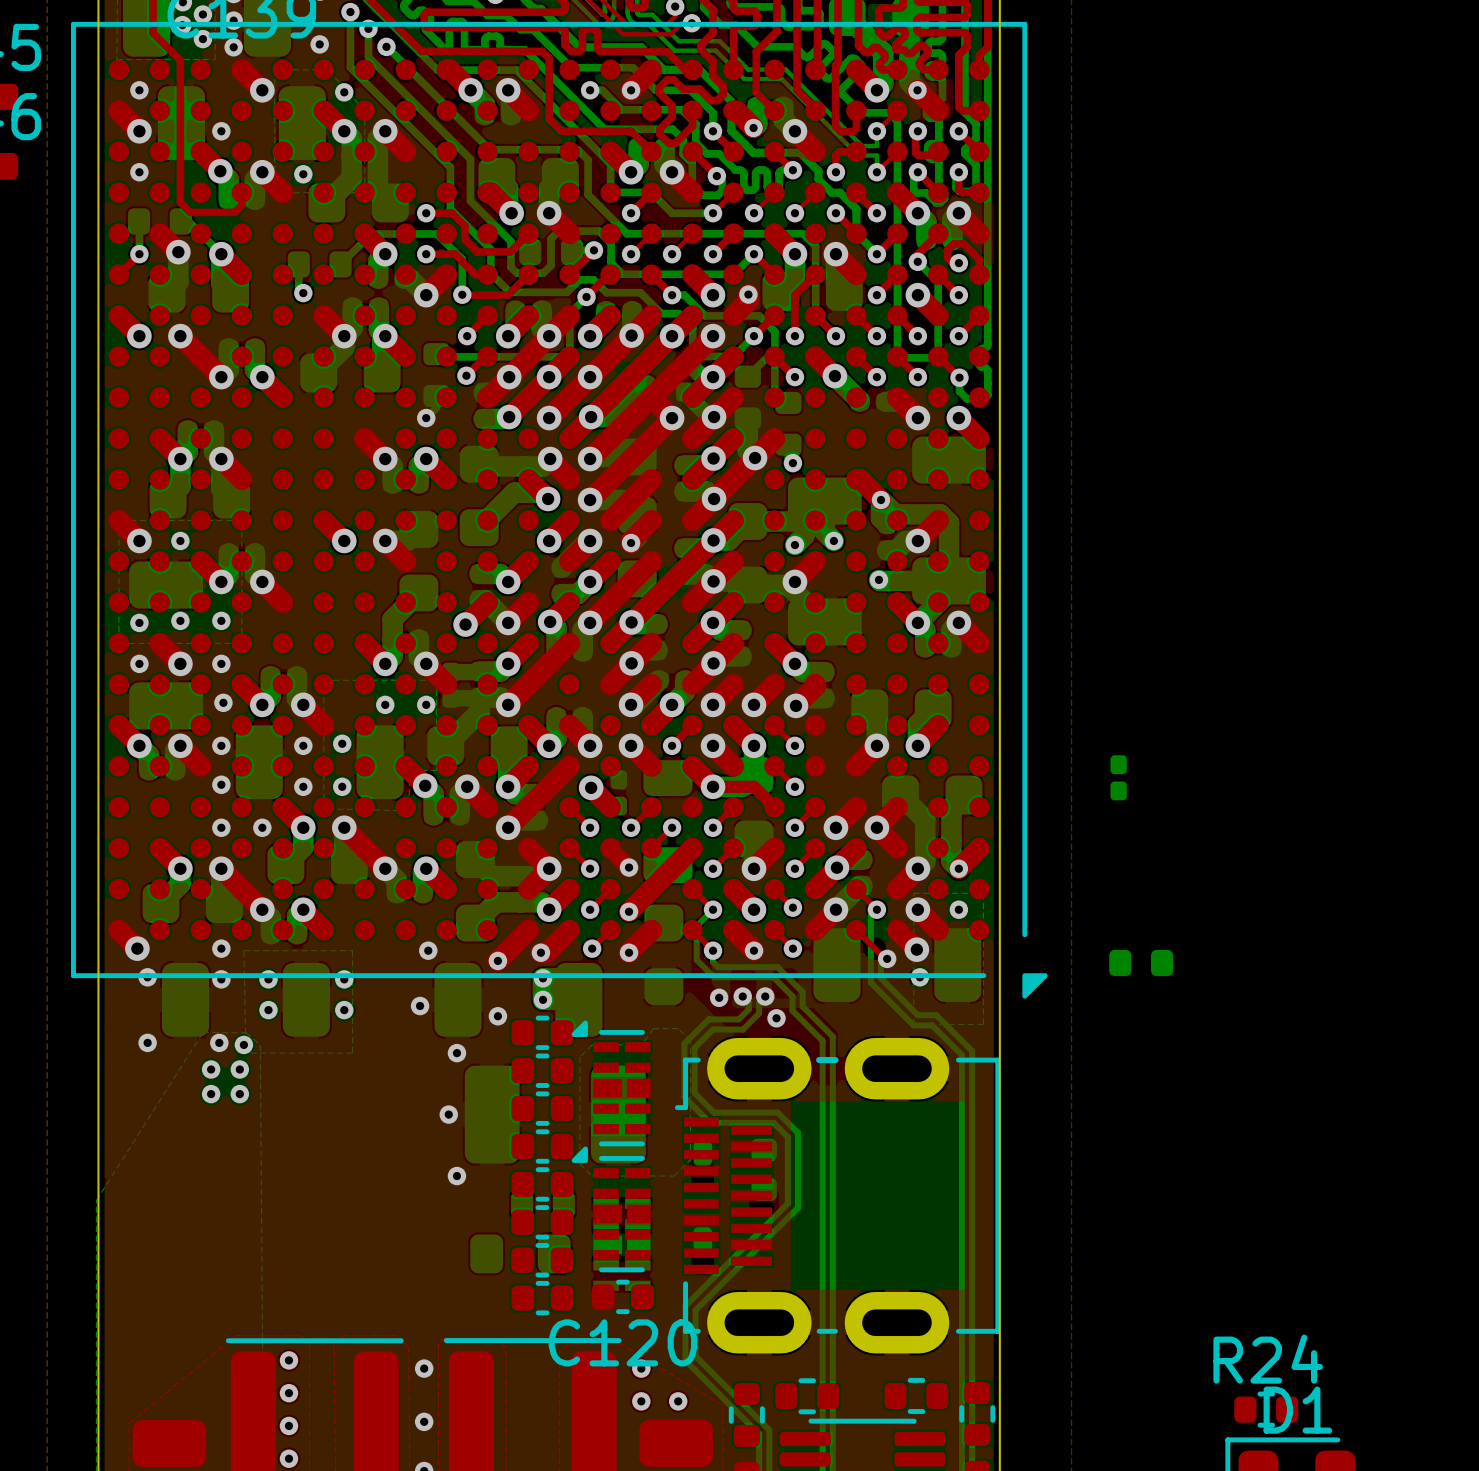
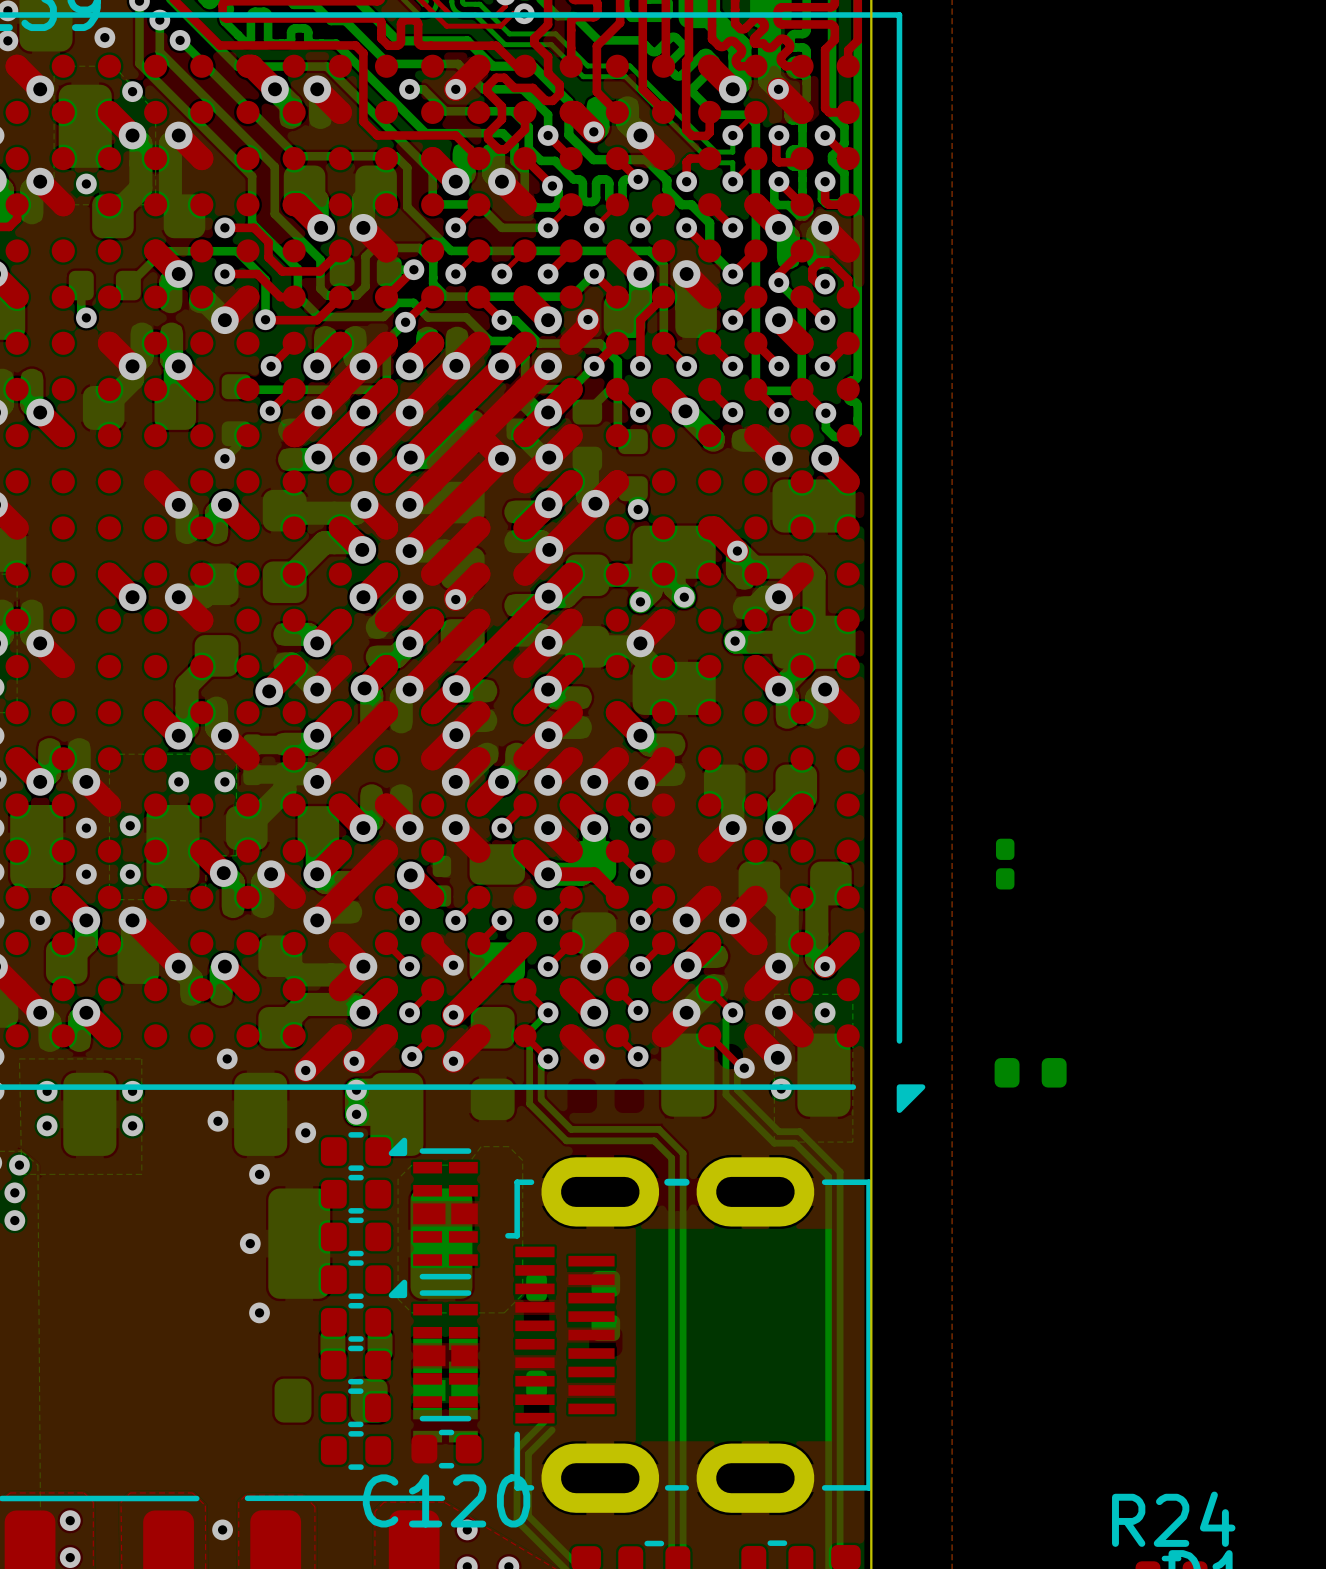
bottom track: (713, 950) (713, 961) (718, 967) (777, 967) (802, 992) (802, 1006) (832, 1036) -> (548, 1058) (541, 1065) (541, 1099) (571, 1129) (658, 1129) (683, 1153) (683, 1155)
bottom track: (696, 960) (714, 977) (773, 977) (792, 996) (792, 1010) (822, 1040) -> (529, 1069) (529, 1103) (566, 1140) (654, 1140) (671, 1158) (671, 1160)
bottom track: (742, 996) (748, 1002) (748, 1009) (738, 1019) (708, 1019) (684, 1043) (684, 1097) (709, 1122) (773, 1122) (787, 1137) (787, 1203) (685, 1306) -> (544, 1421) (516, 1449) (516, 1459)
via: (742, 996) -> none
bottom track: (765, 996) (759, 1002) (759, 1013) (743, 1029) (713, 1029) (694, 1048) (694, 1093) (714, 1112) (777, 1112) (798, 1132) (798, 1207) (695, 1310) -> (552, 1430) (528, 1453) (528, 1464)
via: (765, 996) -> none
via: (719, 997) -> none
via: (776, 1018) -> none

